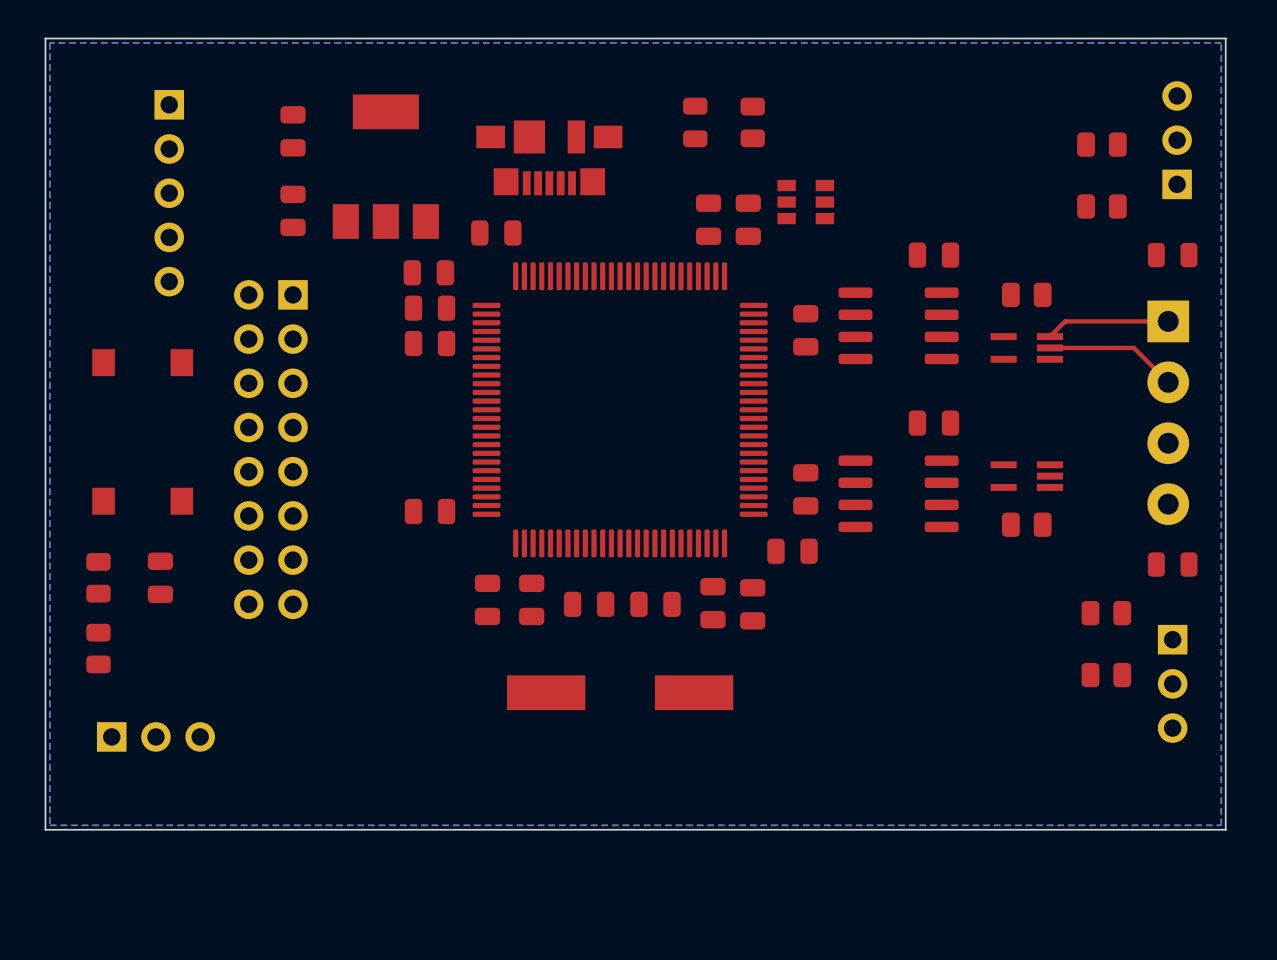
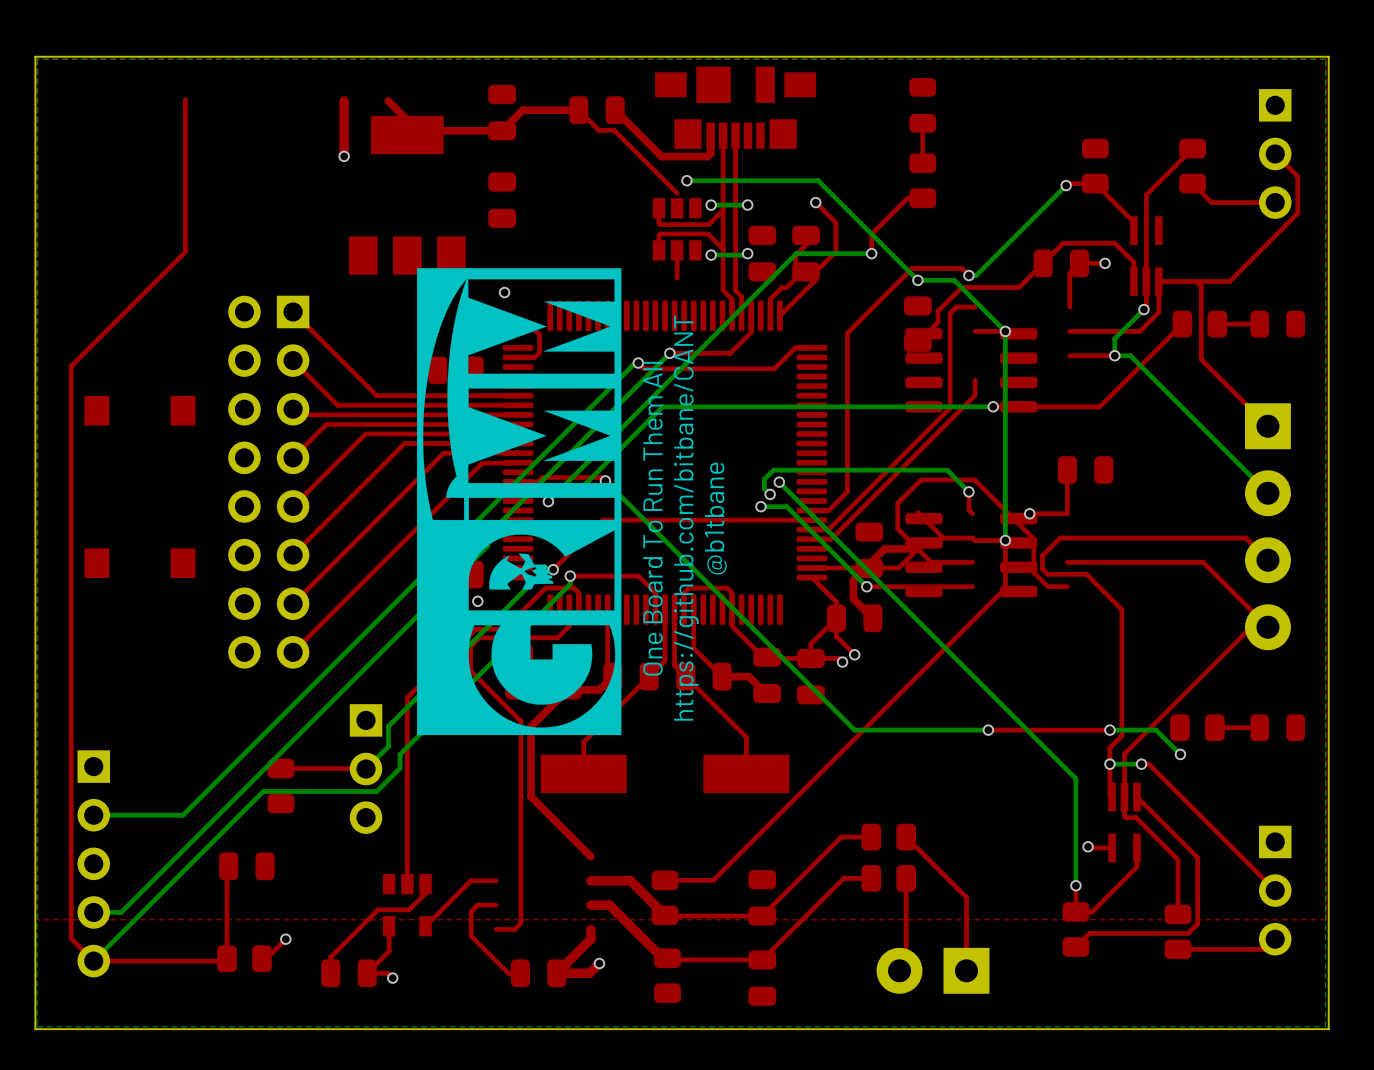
board edge: (1225, 38) (1225, 829) (45, 829) (45, 38) (1225, 38) -> (1328, 56) (1328, 1029) (35, 1029) (35, 56) (1328, 56)
bottom zone outline: (1220, 42) (1221, 825) (49, 825) (49, 42) -> (1325, 59) (1325, 1026) (37, 1026) (37, 59)
top track: none -> (185, 99) (185, 252) (71, 366) (71, 938) (93, 961) (224, 961) (227, 958) (227, 867) (228, 866)
top track: none -> (344, 100) (344, 156)
top track: none -> (388, 100) (418, 130) (502, 130) (522, 110) (578, 110) (598, 130) (614, 130) (677, 193)
part: none -> (596, 110)
top track: none -> (615, 110) (661, 156) (707, 156) (710, 153) (710, 135)
part: none -> (502, 112)
top track: none -> (922, 123) (922, 163)
top track: none -> (723, 135) (723, 290) (732, 299) (732, 315)
top track: none -> (735, 135) (735, 290) (741, 296) (741, 315)
part position: (695, 122) -> (922, 105)
part position: (752, 122) -> (922, 180)
top track: none -> (1192, 148) (1146, 194) (1146, 307) (1143, 309)
top track: none -> (1275, 153) (1297, 176) (1297, 213) (1229, 281) (1158, 281) (1158, 312) (1139, 331) (1069, 331)
part: (293, 131) -> none
via: none -> (344, 156)
part: none -> (1095, 166)
part rotation: 0° (1177, 140) -> 180° (1275, 153)
part rotation: 0° (1101, 144) -> 90° clockwise (1192, 166)
bottom track: none -> (686, 180) (818, 180) (917, 280) (954, 280) (1005, 331) (1005, 540)
via: none -> (686, 180)
top track: none -> (1192, 183) (1211, 202) (1275, 202)
part position: (549, 157) -> (735, 107)
top track: none -> (1066, 185) (1068, 183) (1095, 183) (1133, 222) (1133, 230)
bottom track: none -> (1066, 185) (976, 275) (968, 275)
via: none -> (1066, 185)
top track: none -> (922, 198) (907, 198) (871, 234) (871, 253)
part: none -> (502, 200)
top track: none -> (815, 202) (835, 222) (835, 251) (815, 271) (815, 279) (779, 315)
via: none -> (815, 202)
via: none -> (711, 205)
bottom track: none -> (747, 205) (711, 205)
via: none -> (747, 205)
top track: none -> (659, 208) (660, 224) (708, 224) (723, 210)
part: (169, 193) -> none
part rotation: 0° (805, 202) -> 90° clockwise (677, 229)
part position: (805, 202) -> (677, 229)
top track: none -> (815, 235) (795, 255) (795, 278) (786, 287) (781, 287) (770, 299) (770, 315)
part: (1101, 206) -> none
part: (293, 210) -> none
top track: none -> (723, 249) (708, 234) (660, 234) (659, 250)
top track: none -> (677, 250) (677, 277)
bottom track: none -> (747, 253) (711, 255)
via: none -> (747, 253)
bottom track: none -> (871, 253) (796, 253) (548, 501)
via: none -> (871, 253)
via: none -> (711, 255)
part: none -> (1146, 256)
part: none -> (1061, 263)
top track: none -> (1105, 263) (1079, 263) (1069, 273) (1069, 307)
via: none -> (1105, 263)
drawing: none -> [416, 268, 622, 736]
part: (496, 233) -> none
top track: none -> (968, 275) (961, 268) (912, 268) (847, 333) (847, 491) (828, 510) (811, 510)
via: none -> (968, 275)
via: none -> (917, 280)
top track: none -> (1133, 281) (1133, 262) (1114, 243) (1063, 243) (1019, 287) (961, 287) (937, 311) (937, 322) (917, 342)
top track: none -> (1196, 281) (1201, 286) (1201, 359) (1267, 426)
via: none -> (504, 292)
part: (933, 255) -> none
part position: (1172, 255) -> (1277, 324)
top track: none -> (975, 307) (956, 307) (950, 313) (950, 408) (829, 529) (812, 529)
bottom track: none -> (1143, 309) (1114, 338) (1114, 355) (1130, 355) (1267, 493)
via: none -> (1143, 309)
top track: none -> (293, 311) (376, 395) (518, 395)
part: (428, 272) -> none
top track: none -> (751, 315) (751, 332) (730, 353) (669, 353)
part: none -> (917, 324)
top track: none -> (1182, 324) (1099, 406) (993, 406)
part: none -> (1199, 324)
top track: none -> (1259, 324) (1217, 324)
top track: none -> (531, 326) (539, 334) (539, 352) (534, 357) (518, 357)
top track: none -> (1005, 331) (975, 331)
via: none -> (1005, 331)
part: (1026, 294) -> none
top track: none -> (811, 347) (795, 347) (774, 368) (644, 368) (638, 363)
part: (430, 308) -> none
bottom track: none -> (669, 353) (487, 535) (487, 546) (121, 912) (93, 912)
via: none -> (669, 353)
top track: none -> (1114, 355) (1069, 355)
via: none -> (1114, 355)
top track: none -> (293, 360) (337, 405) (518, 405)
bottom track: none -> (638, 363) (635, 363) (183, 815) (93, 815)
via: none -> (638, 363)
top track: (1168, 321) (1065, 321) (1049, 336) -> none
part: none -> (455, 370)
part: (805, 330) -> none
top track: none -> (975, 380) (975, 395) (831, 539) (811, 539)
part: (430, 343) -> none
part: (1026, 347) -> none
top track: (1049, 347) (1133, 347) (1168, 382) -> none
bottom track: none -> (993, 406) (662, 406) (579, 489)
via: none -> (993, 406)
top track: none -> (293, 409) (298, 414) (518, 414)
top track: none -> (518, 424) (326, 424) (293, 457)
top track: none -> (518, 434) (365, 434) (293, 506)
top track: none -> (518, 443) (404, 443) (293, 555)
top track: none -> (518, 453) (443, 453) (293, 603)
top track: none -> (518, 462) (482, 463) (293, 652)
part position: (1168, 412) -> (1267, 526)
top track: none -> (1067, 470) (1067, 513)
part position: (933, 423) -> (1085, 470)
top track: none -> (605, 480) (602, 477) (542, 477) (538, 481) (518, 481)
bottom track: none -> (605, 480) (854, 730) (988, 730)
via: none -> (605, 480)
bottom track: none -> (779, 482) (1075, 778) (1075, 885)
via: none -> (779, 482)
top track: none -> (968, 491) (968, 510) (972, 513)
bottom track: none -> (968, 491) (947, 470) (773, 470) (764, 479) (764, 488) (770, 494)
via: none -> (968, 491)
via: none -> (770, 494)
via: none -> (548, 501)
part position: (270, 449) -> (268, 482)
bottom track: none -> (760, 506) (786, 506) (866, 586)
via: none -> (760, 506)
top track: none -> (917, 512) (943, 538) (1005, 540) (1005, 588) (713, 880) (665, 880)
via: none -> (1029, 513)
top track: none -> (1067, 513) (1029, 513)
text: none -> https://github.com/bitbane/CANT (686, 518)
text: none -> One Board To Run Them All (652, 518)
text: none -> @b1tbane (715, 518)
top track: none -> (811, 520) (602, 520) (553, 569)
part: (1026, 476) -> none
via: none -> (1005, 540)
top track: none -> (1267, 560) (1245, 538) (1060, 538) (1042, 555) (1042, 569) (1047, 574) (1086, 574) (1121, 609) (1121, 735) (1109, 747) (1109, 794) (1112, 797)
top track: none -> (972, 562) (931, 562) (897, 528) (897, 503) (921, 479) (974, 479) (1033, 539) (1033, 572) (1047, 586) (1067, 586)
top track: none -> (1067, 562) (1203, 562) (1267, 627) (1251, 627) (1124, 753) (1124, 816) (1136, 817) (1178, 859) (1178, 914)
top track: none -> (811, 567) (898, 567) (917, 548) (884, 548) (853, 580) (853, 598) (872, 618)
bottom track: none -> (553, 569) (545, 569) (388, 726) (388, 746) (366, 769)
via: none -> (553, 569)
top track: none -> (570, 576) (638, 576) (655, 593) (655, 609)
bottom track: none -> (570, 576) (570, 584) (400, 754) (400, 768) (376, 791) (263, 791) (93, 961)
via: none -> (570, 576)
top track: none -> (811, 577) (836, 602) (836, 636) (854, 654)
via: none -> (866, 586)
top track: none -> (972, 586) (866, 586)
part: (1026, 524) -> none
via: none -> (477, 601)
top track: none -> (569, 609) (569, 626) (557, 637) (479, 637) (470, 646) (470, 670) (521, 721) (521, 923) (514, 929) (496, 929)
top track: none -> (578, 609) (578, 593) (573, 588) (545, 588) (504, 629) (475, 629) (407, 697) (407, 884)
top track: none -> (607, 609) (607, 671) (612, 676) (599, 689) (567, 689) (531, 726) (531, 796) (590, 856)
top track: none -> (665, 609) (665, 660) (583, 742) (583, 773)
top track: none -> (674, 609) (674, 665) (746, 737) (746, 773)
top track: none -> (684, 609) (684, 593) (689, 588) (727, 588) (732, 593) (732, 626) (764, 658) (838, 658) (842, 662)
top track: none -> (693, 609) (693, 648) (722, 676) (748, 676) (767, 694)
top track: none -> (836, 618) (810, 643) (810, 658)
part position: (1172, 564) -> (1277, 727)
part: (98, 577) -> none
part: (160, 577) -> none
via: none -> (854, 654)
via: none -> (842, 662)
part: (1106, 613) -> none
part: (98, 648) -> none
part: none -> (1197, 727)
top track: none -> (1259, 727) (1214, 727)
via: none -> (988, 730)
top track: none -> (1109, 730) (988, 730)
bottom track: none -> (1109, 730) (1156, 730) (1180, 754)
via: none -> (1109, 730)
via: none -> (1180, 754)
part: (1106, 675) -> none
via: none -> (1109, 764)
top track: none -> (1141, 764) (1148, 764) (1275, 890)
bottom track: none -> (1141, 764) (1109, 764)
via: none -> (1141, 764)
part position: (1172, 683) -> (1275, 890)
top track: none -> (280, 768) (366, 769)
part: none -> (280, 786)
top track: none -> (1136, 797) (1197, 857) (1197, 924) (1188, 933) (1089, 933) (1075, 946)
part rotation: 0° (155, 736) -> 90° clockwise (366, 769)
part position: (155, 736) -> (366, 769)
part: none -> (1124, 822)
top track: none -> (871, 837) (841, 837) (762, 916) (665, 916) (630, 880) (590, 880)
part: none -> (888, 837)
top track: none -> (906, 837) (966, 897) (966, 970)
top track: none -> (1088, 846) (1112, 847)
via: none -> (1088, 846)
top track: none -> (1136, 847) (1136, 867) (1092, 912) (1075, 912) (1075, 885)
part: none -> (93, 863)
part: none -> (246, 866)
top track: none -> (871, 878) (843, 878) (762, 959) (669, 959) (662, 958) (609, 905) (590, 905)
part: none -> (888, 878)
top track: none -> (906, 878) (906, 964) (899, 970)
top track: none -> (496, 880) (470, 880) (425, 926)
top track: none -> (425, 884) (425, 893) (409, 909) (377, 909) (330, 957) (330, 973)
via: none -> (1075, 885)
part: none -> (665, 897)
part: none -> (762, 897)
part: none -> (407, 905)
top track: none -> (496, 905) (477, 905) (471, 911) (471, 936) (508, 973) (520, 973)
top track: none -> (389, 926) (389, 951) (367, 973) (387, 973) (392, 978)
top track: none -> (590, 929) (590, 939) (556, 973) (589, 973) (599, 963)
part: none -> (1075, 929)
part: none -> (1178, 931)
top track: none -> (285, 939) (266, 958) (261, 958)
via: none -> (285, 939)
top track: none -> (1275, 939) (1265, 949) (1178, 949)
part: none -> (244, 958)
via: none -> (599, 963)
part: none -> (933, 970)
part: none -> (349, 973)
part: none -> (538, 973)
part: none -> (667, 975)
via: none -> (392, 978)
part: none -> (762, 978)

